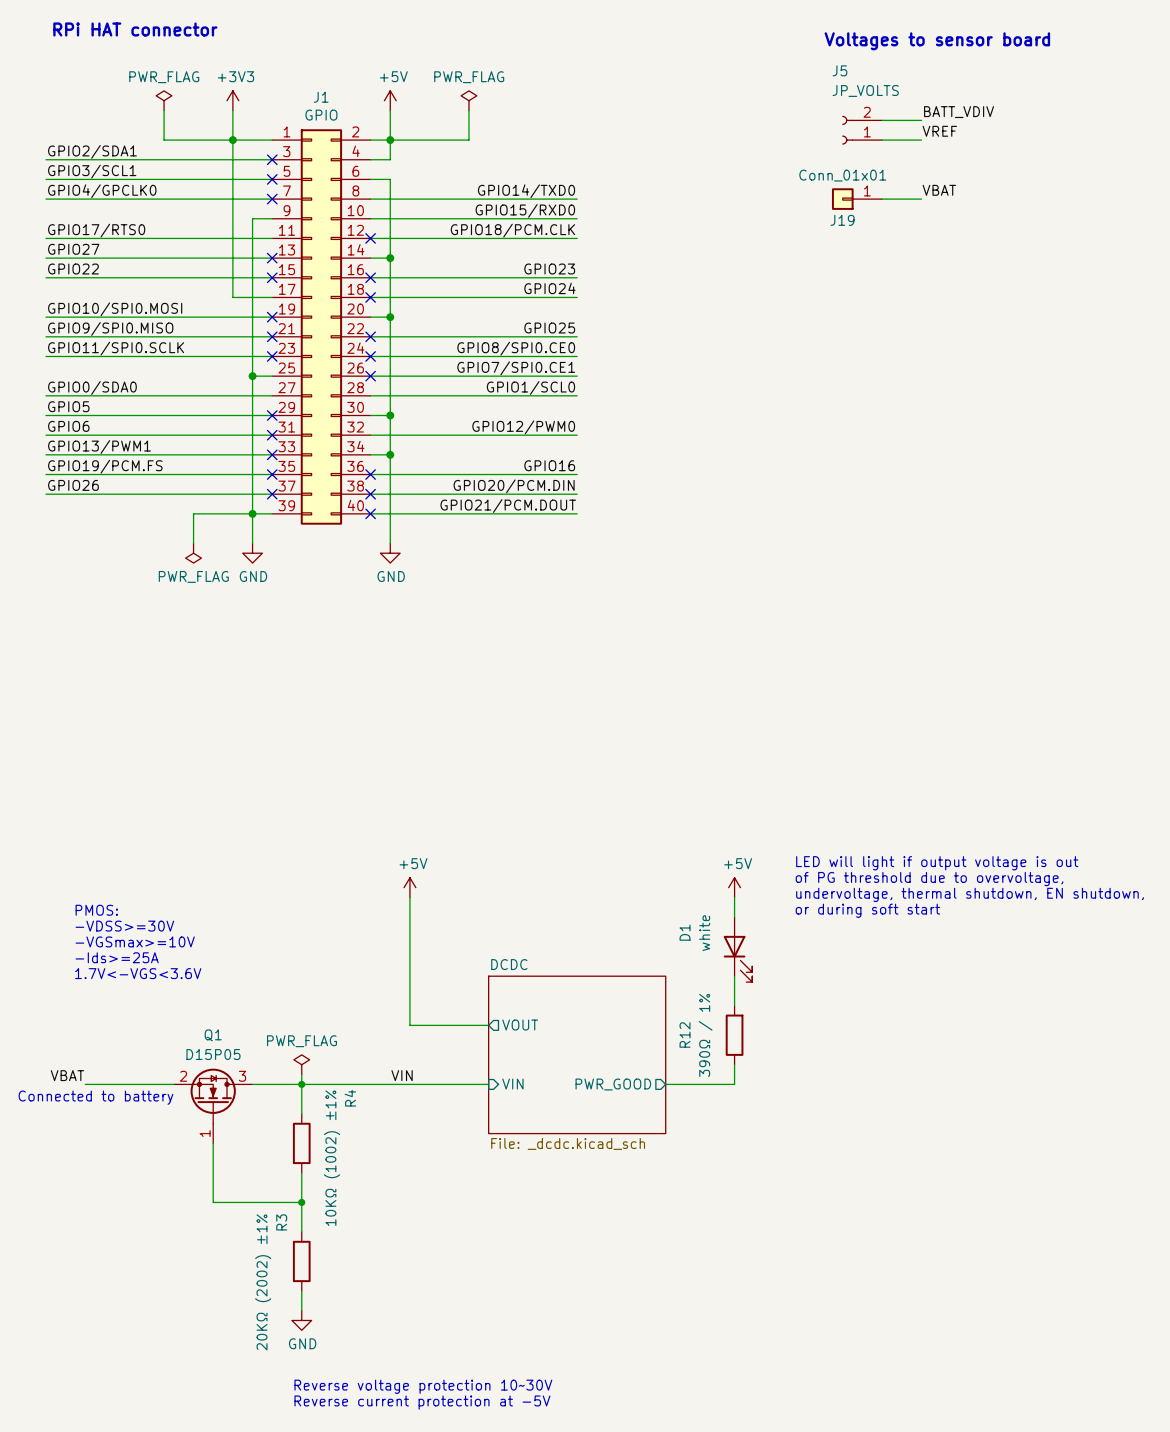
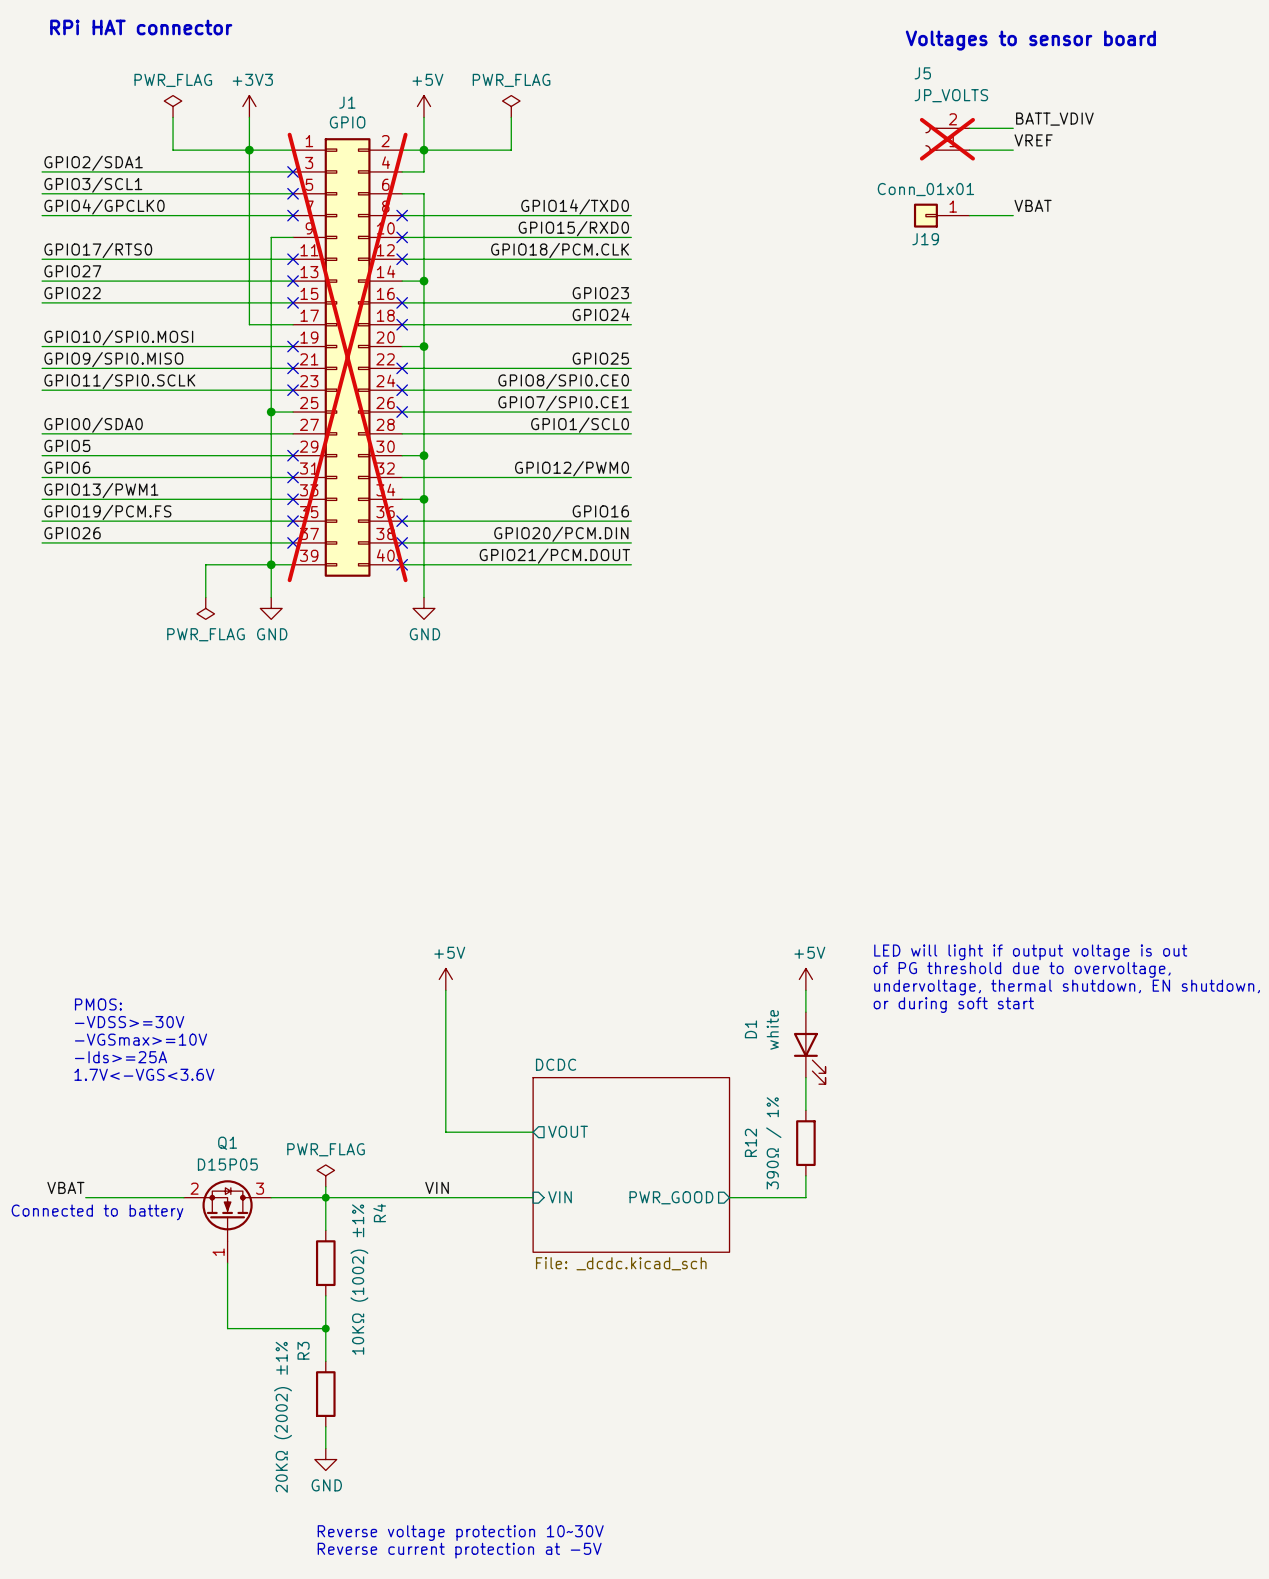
J5 do-not-place cross: none -> (947, 139)
no-connect mark: none -> (402, 215)
no-connect mark: none -> (402, 237)
no-connect mark: none -> (293, 259)
J1 do-not-place cross: none -> (347, 357)

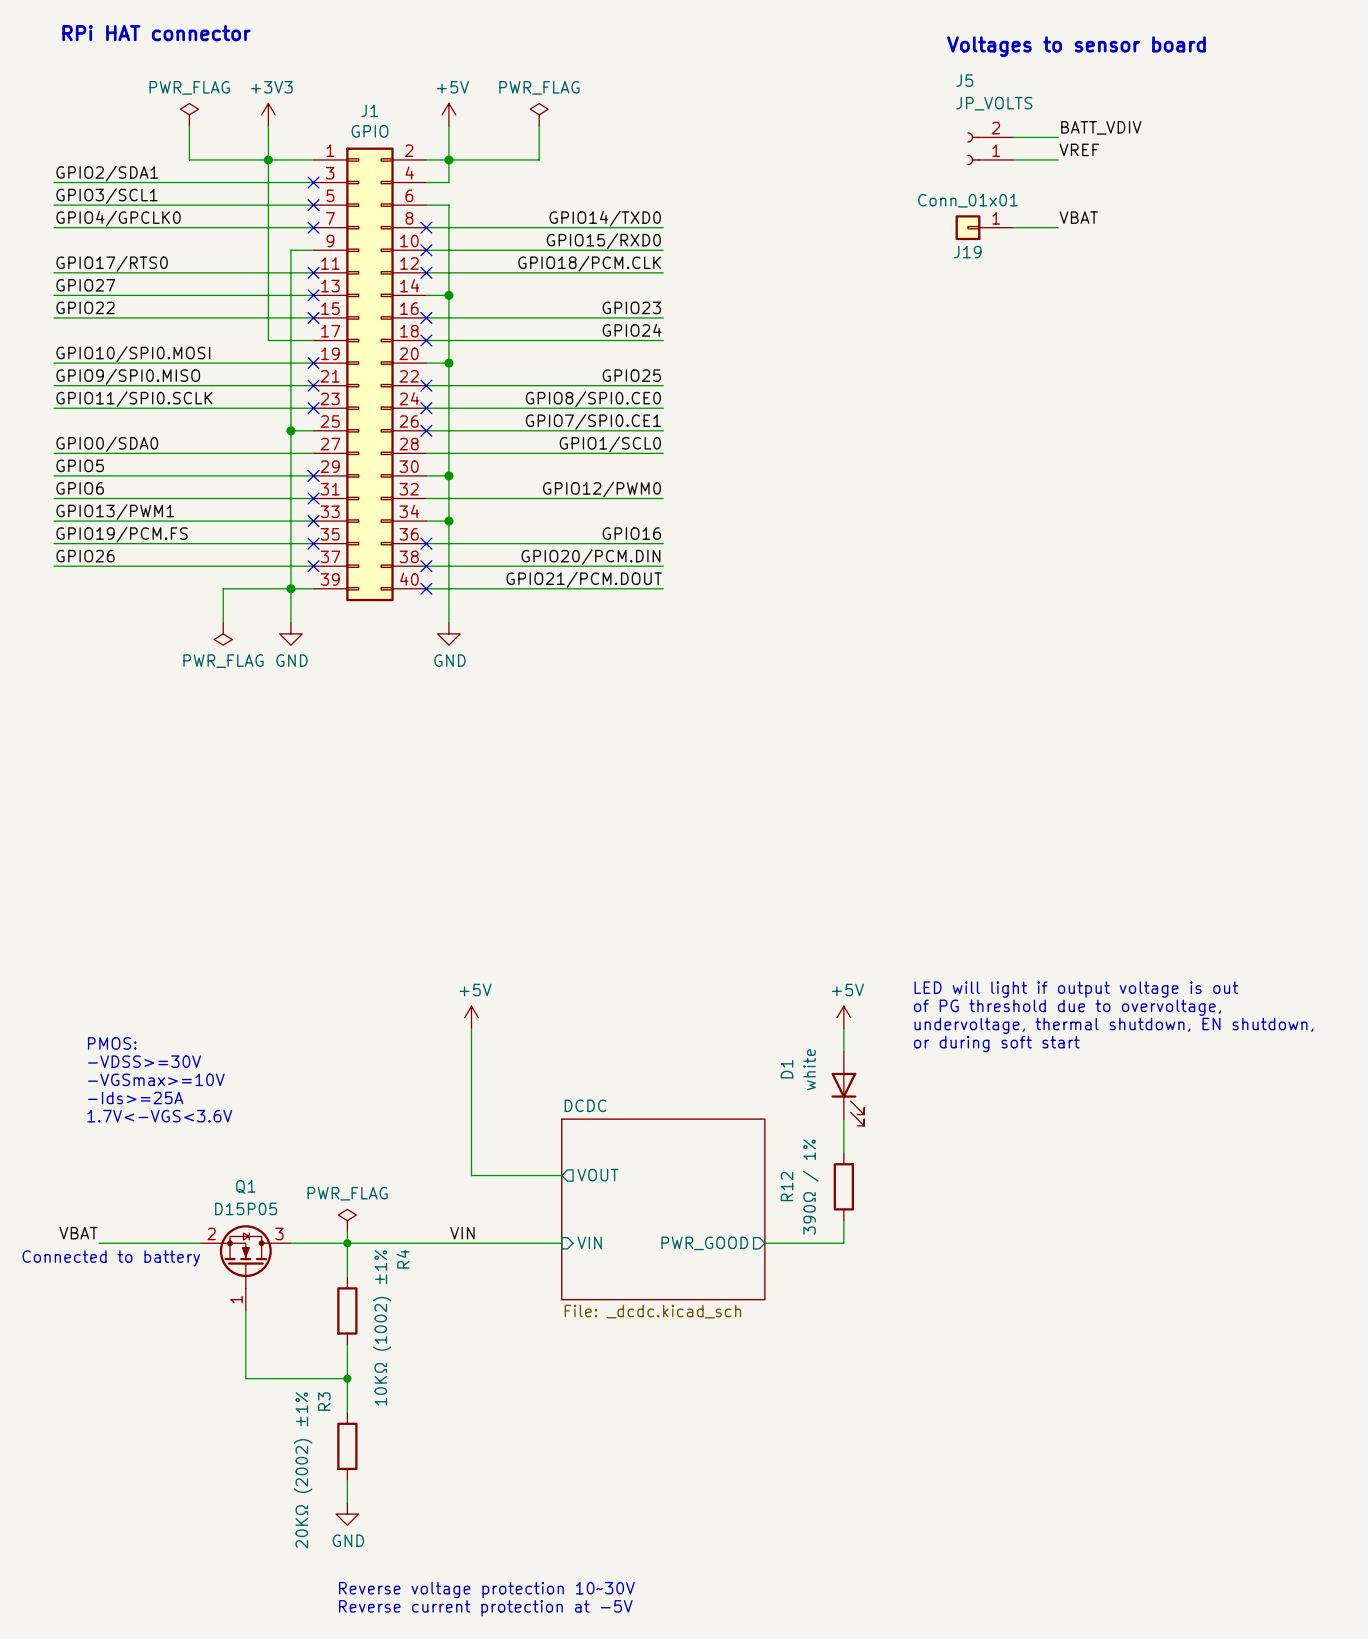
J5 do-not-place cross: (947, 139) -> none
J1 do-not-place cross: (347, 357) -> none

